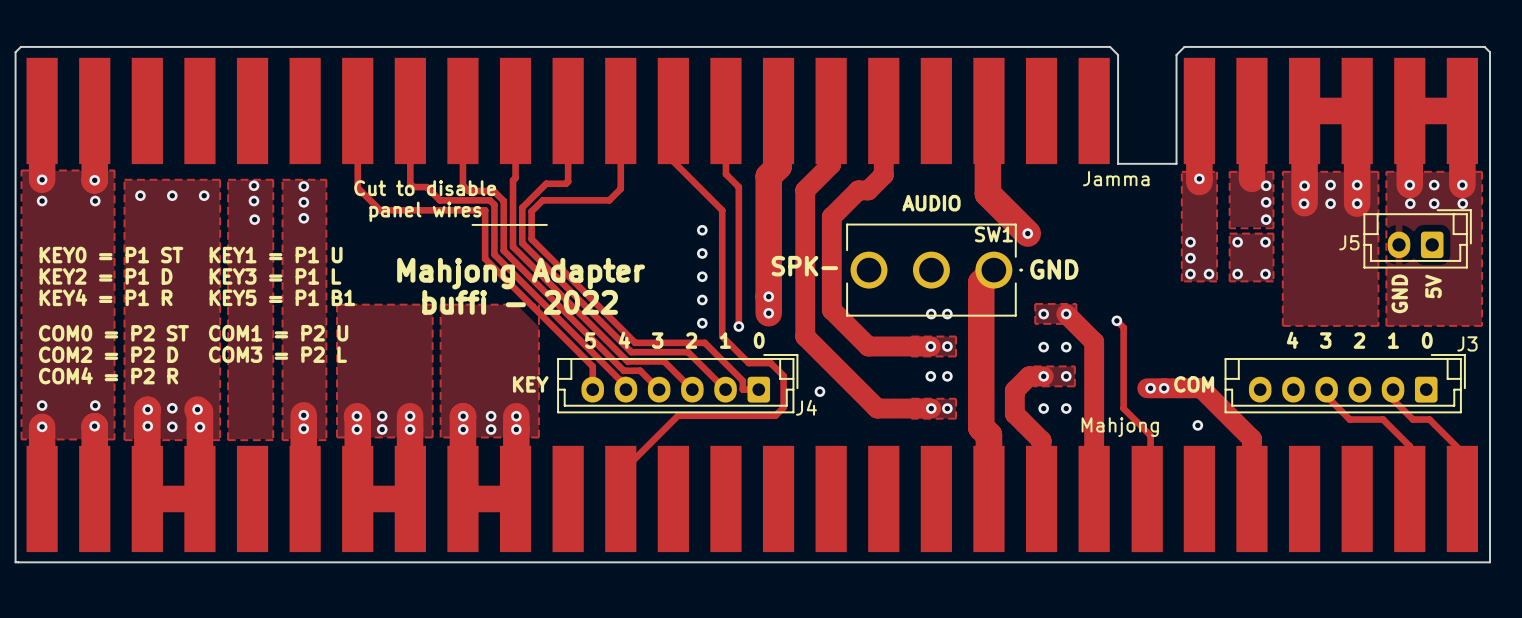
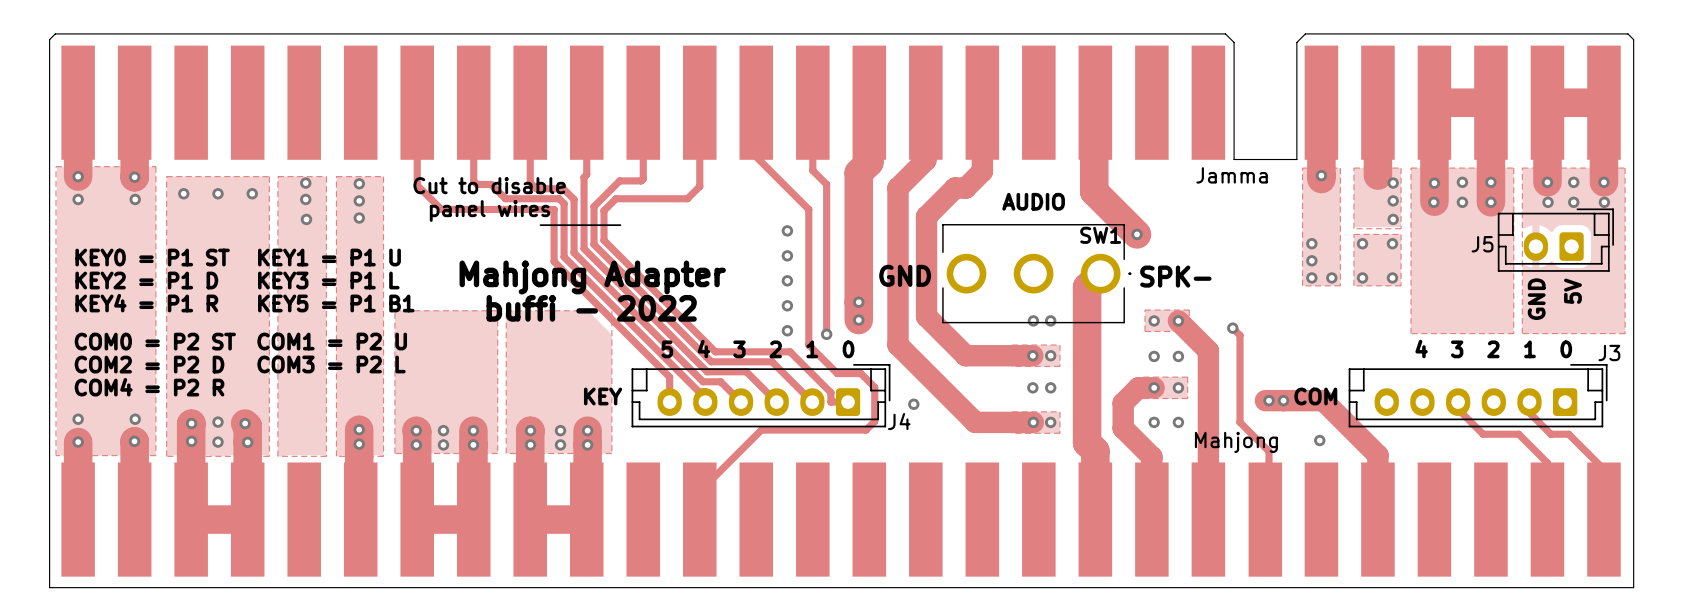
text position: SPK- (804, 266) -> SPK- (1175, 276)
text position: GND (1054, 269) -> GND (905, 275)

